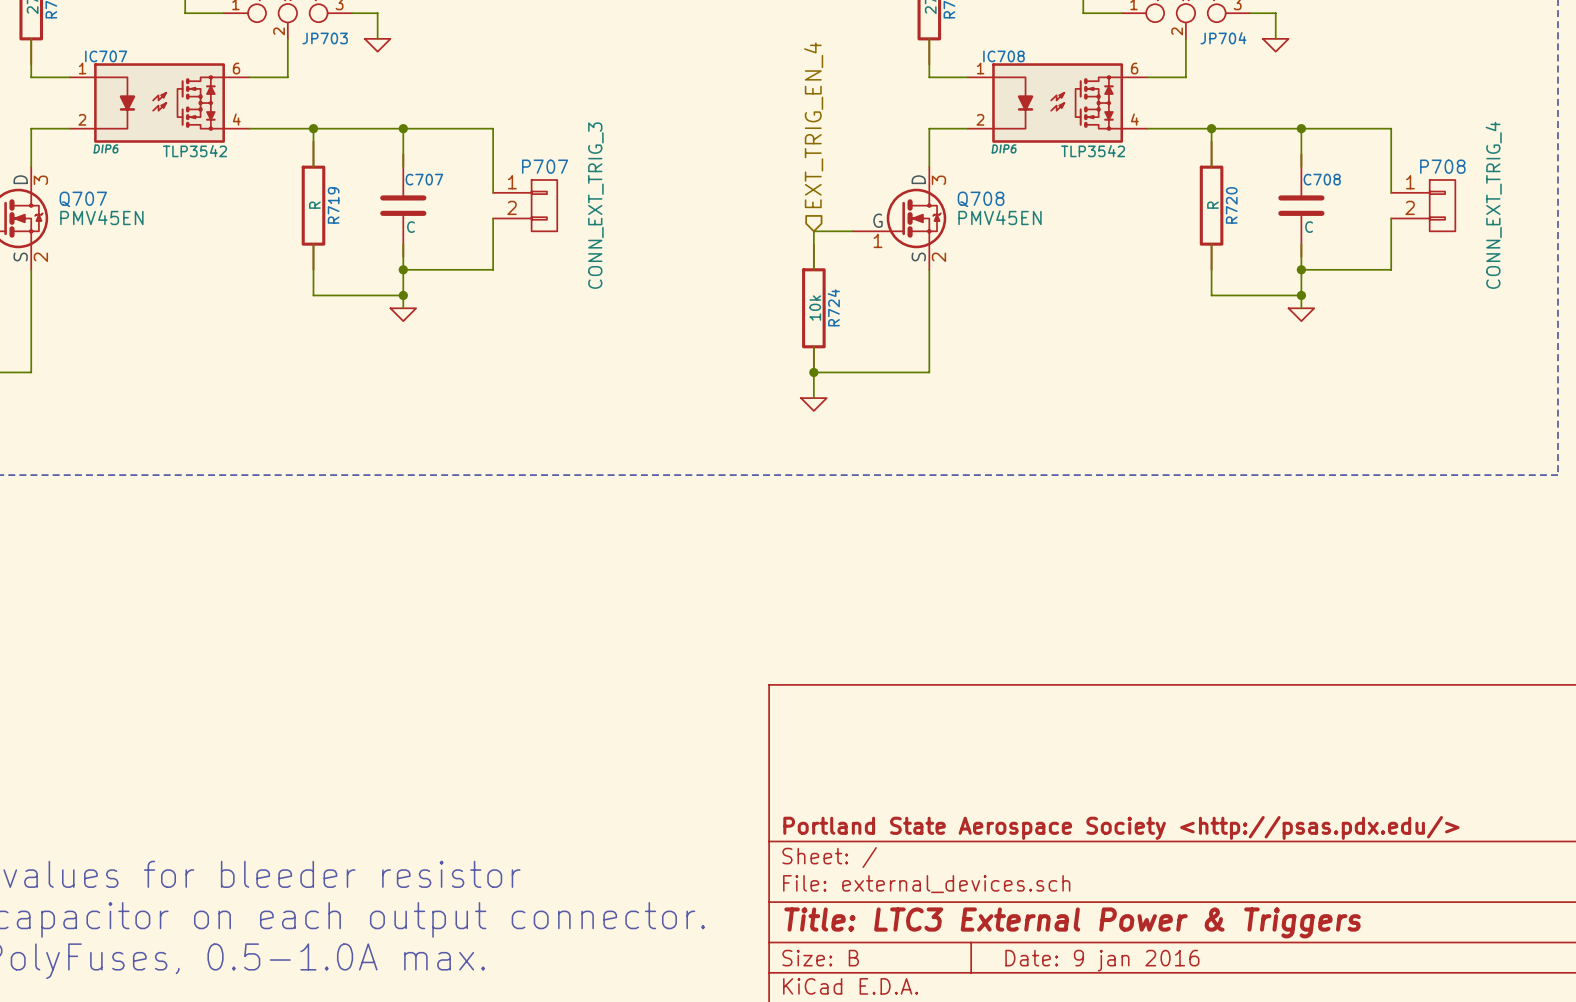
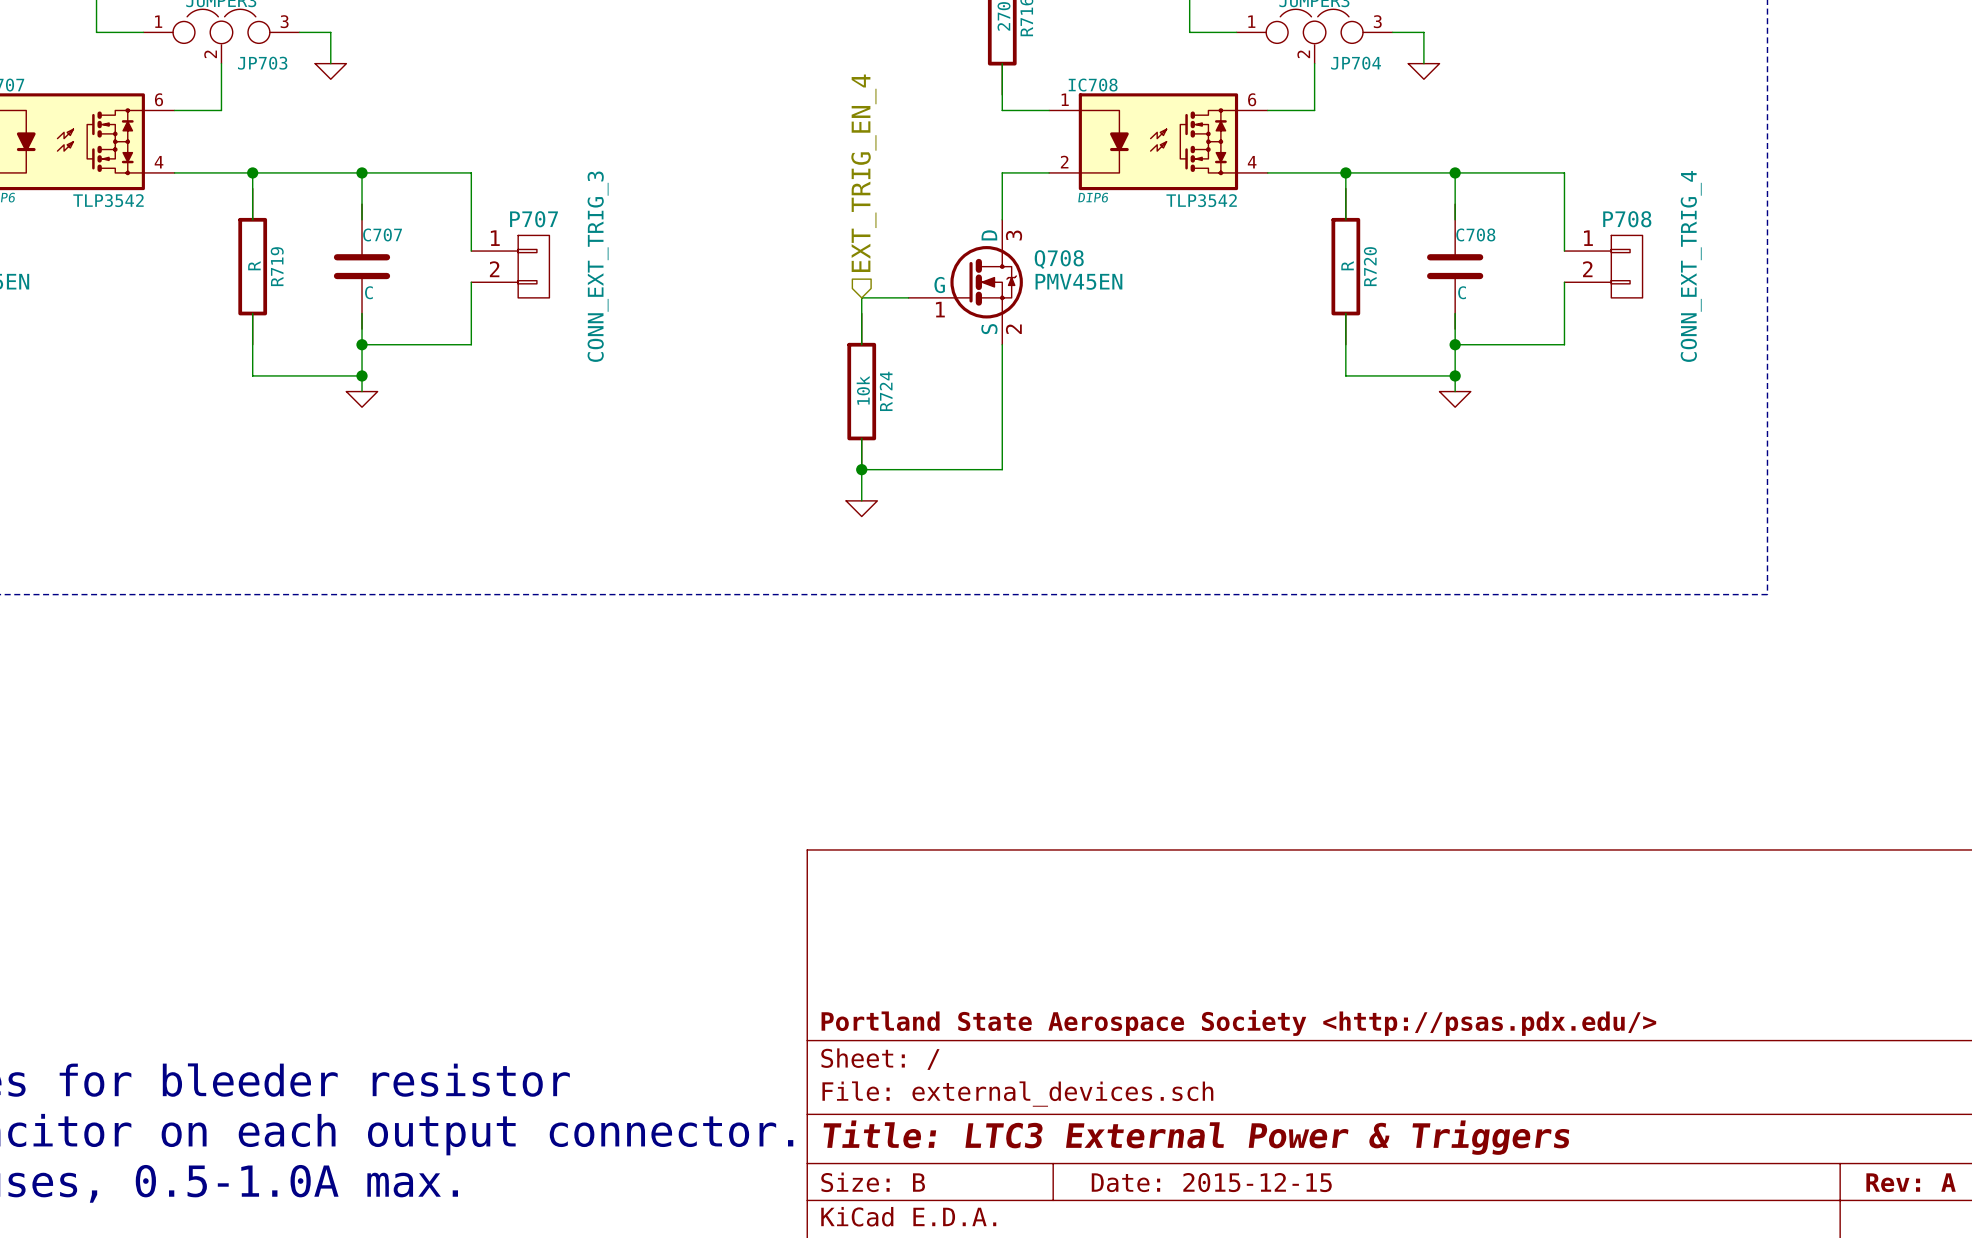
title block: Date: 9 jan 2016 (1102, 960) -> Date: 2015-12-15 (1211, 1182)

